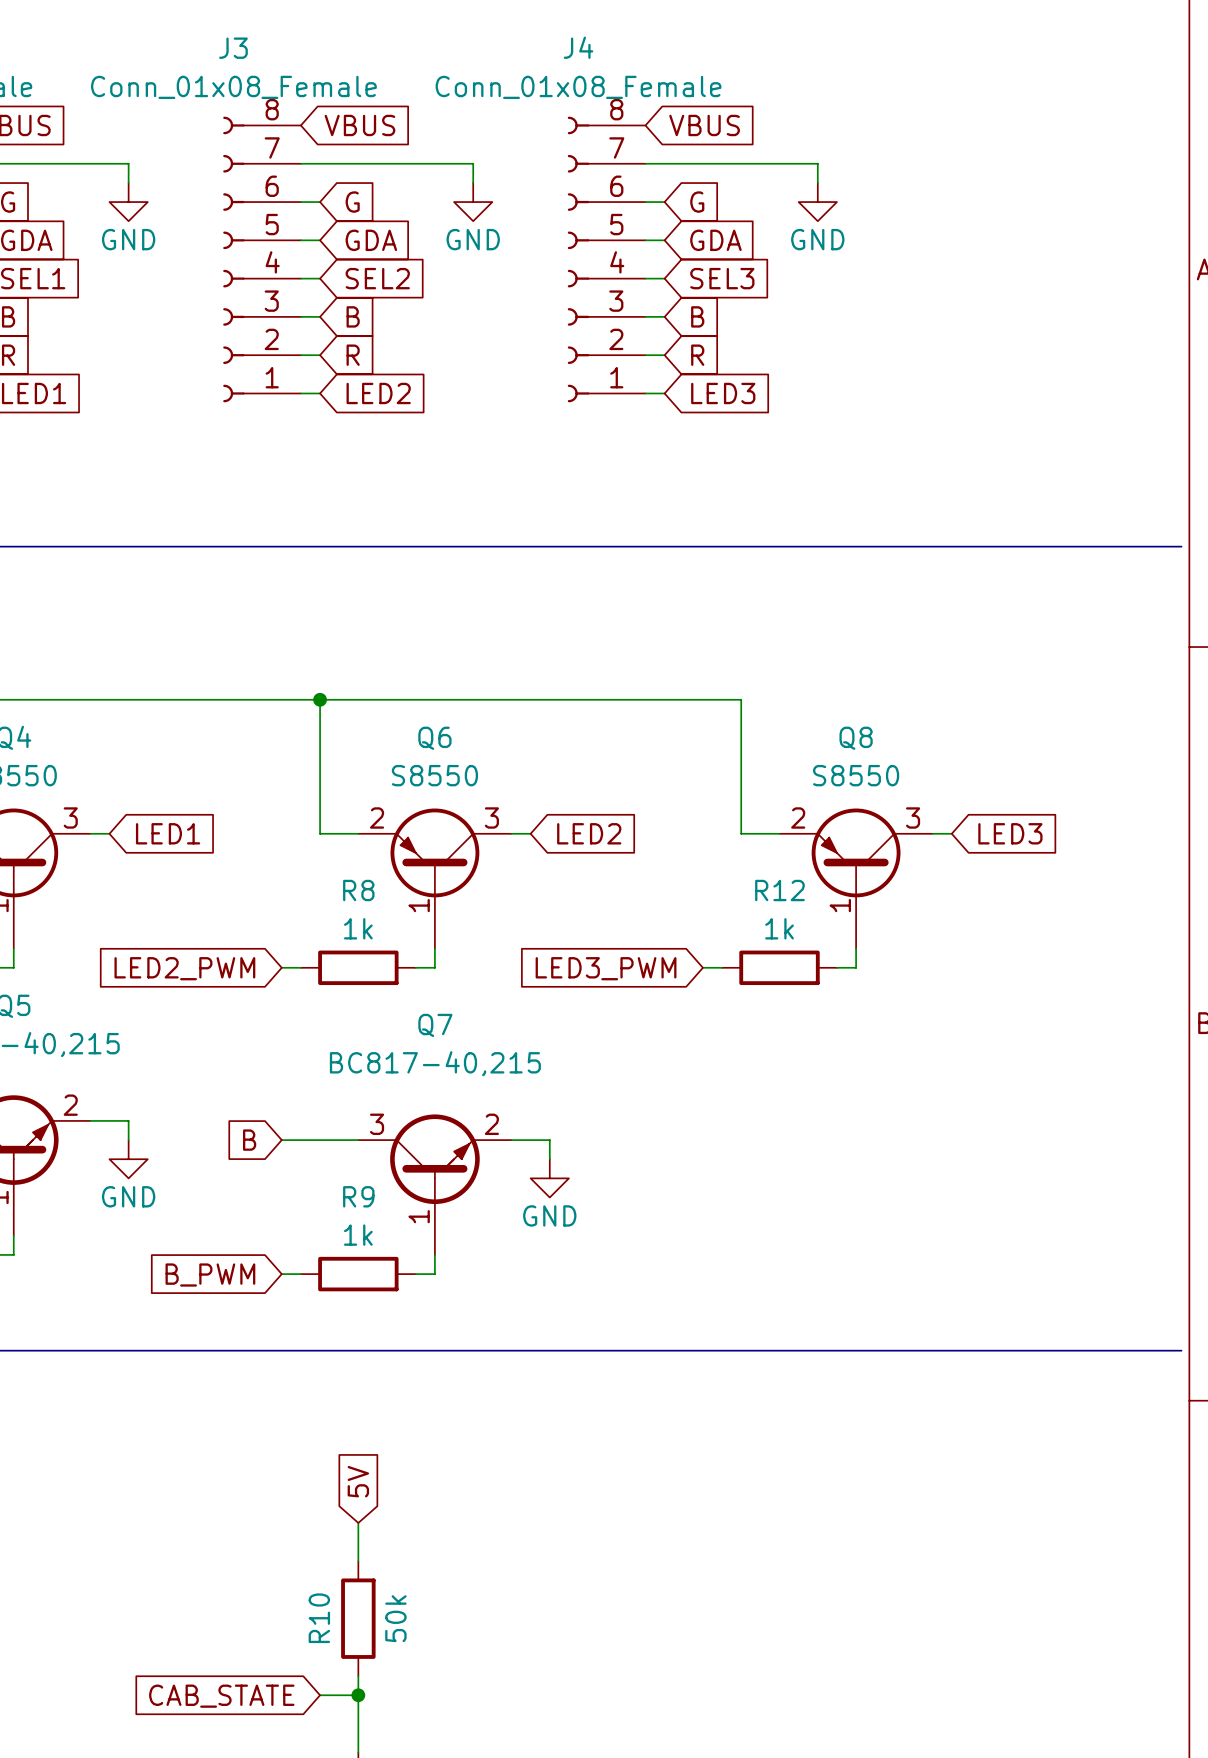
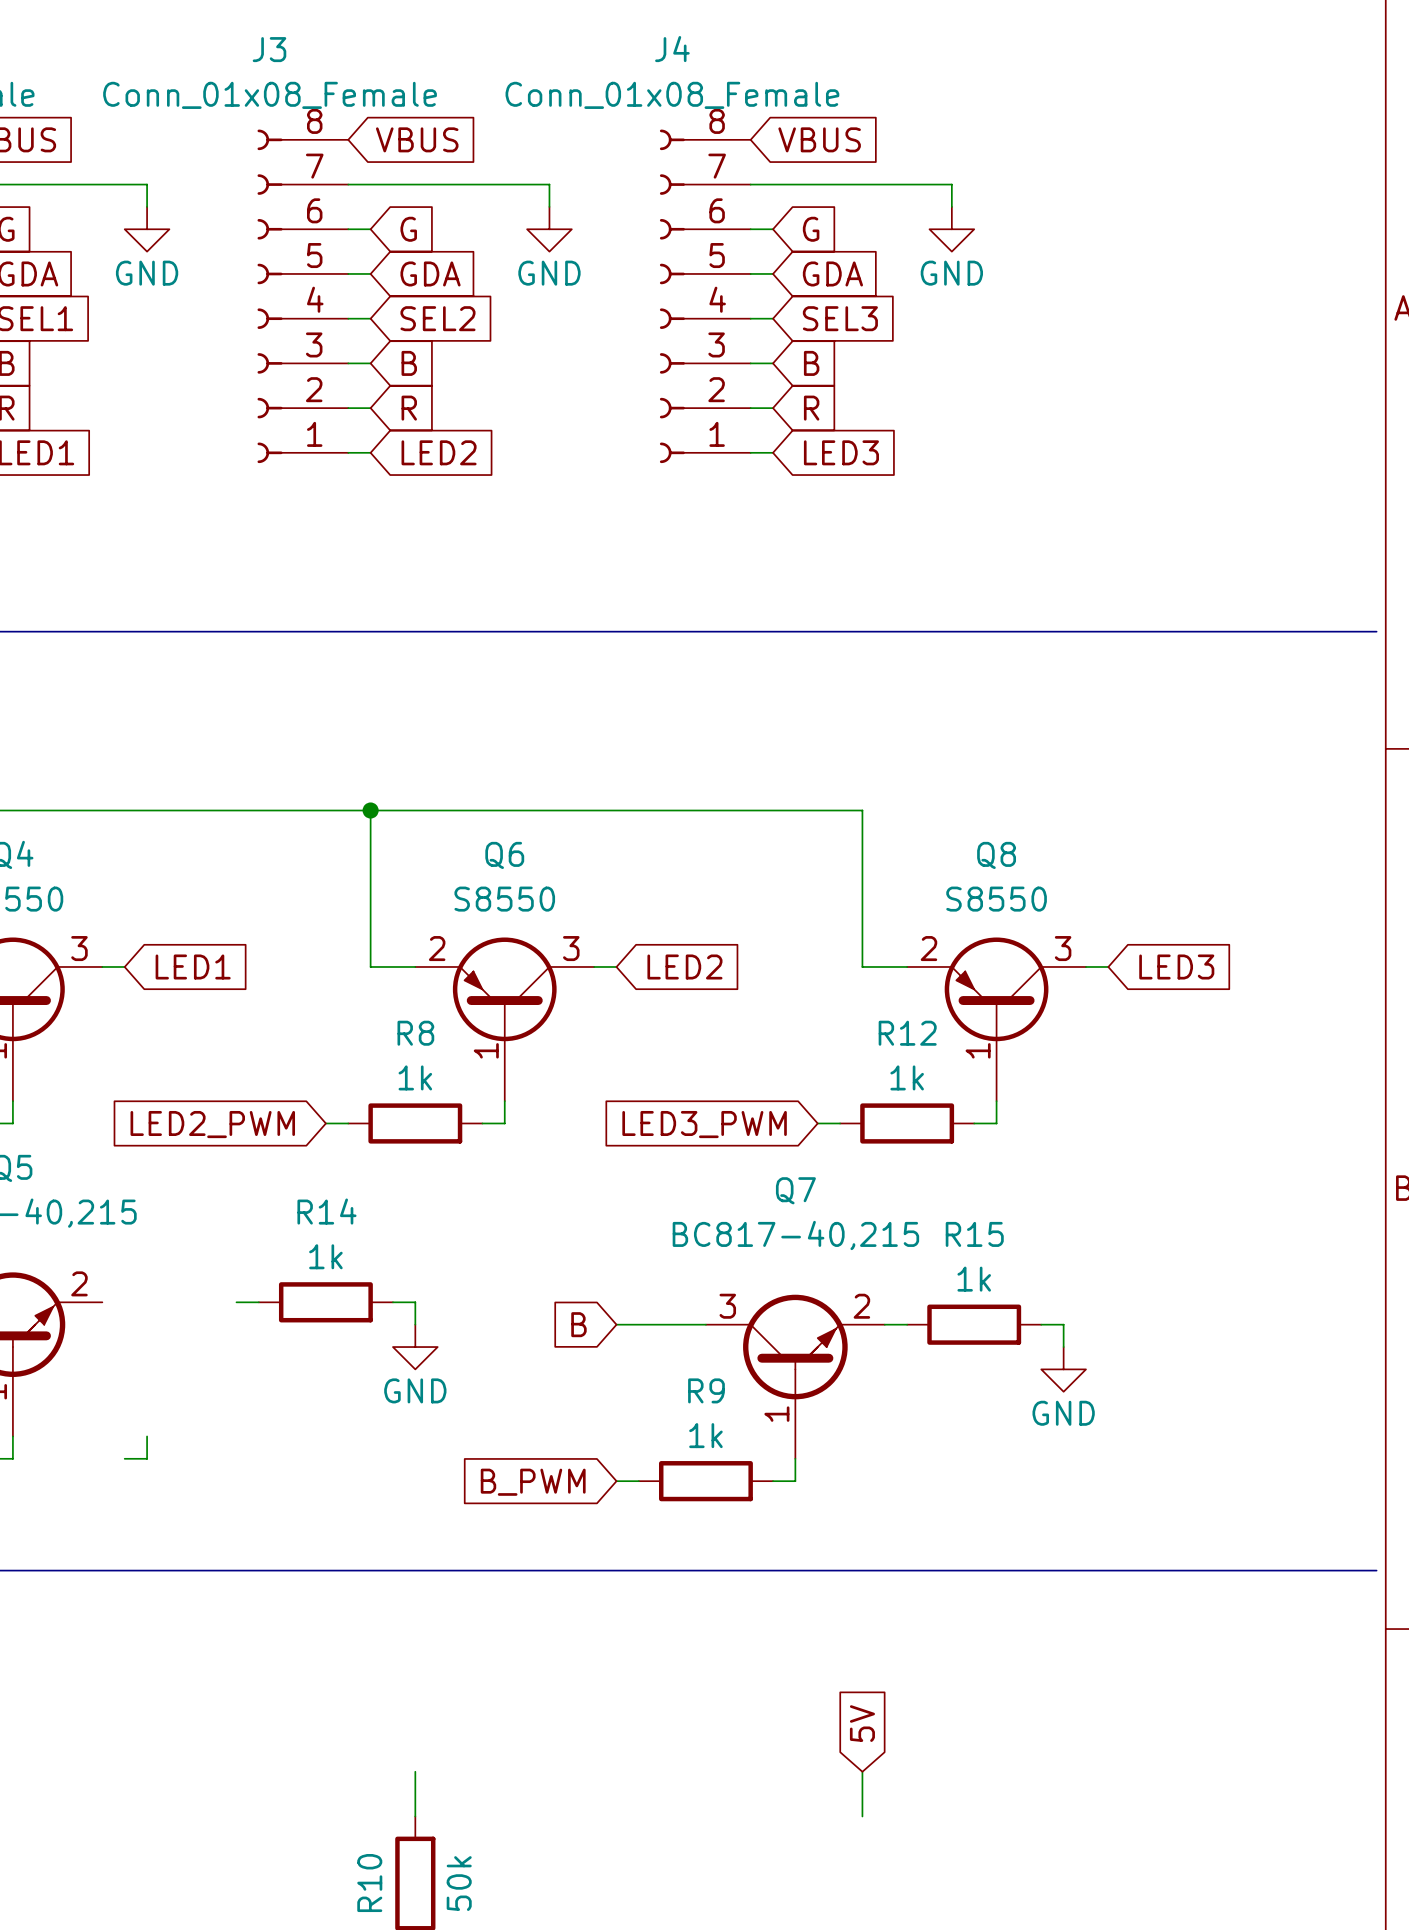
wire: (90, 1120) (128, 1120) (128, 1140) -> none
wire: none -> (236, 1302) (258, 1302)
R14: none -> 1k (325, 1302)
global label position: B (249, 1140) -> B (578, 1324)
wire: (281, 1140) (358, 1140) -> (392, 1302) (415, 1302) (415, 1324)
wire: (511, 1140) (530, 1140) -> (884, 1324) (907, 1324)
wire: (549, 1140) (549, 1159) -> (638, 1324) (705, 1324)
R15: none -> 1k (974, 1324)
wire: none -> (1041, 1324) (1063, 1324) (1063, 1347)
power symbol: GND (128, 1159) -> none
power symbol: none -> GND (415, 1347)
power symbol: GND (549, 1178) -> none
power symbol: none -> GND (1063, 1369)
Q7 position: (434, 1184) -> (795, 1376)
wire: none -> (147, 1436) (147, 1458) (124, 1458)
wire: (434, 1254) (434, 1274) (415, 1274) -> (795, 1458) (795, 1481) (773, 1481)
wire: (281, 1274) (300, 1274) -> (616, 1481) (638, 1481)
R9 position: (358, 1274) -> (705, 1481)
global label position: B_PWM (210, 1275) -> B_PWM (533, 1482)
global label: 5V (358, 1481) -> none
global label: none -> 5V (862, 1723)
wire: none -> (862, 1771) (862, 1816)

